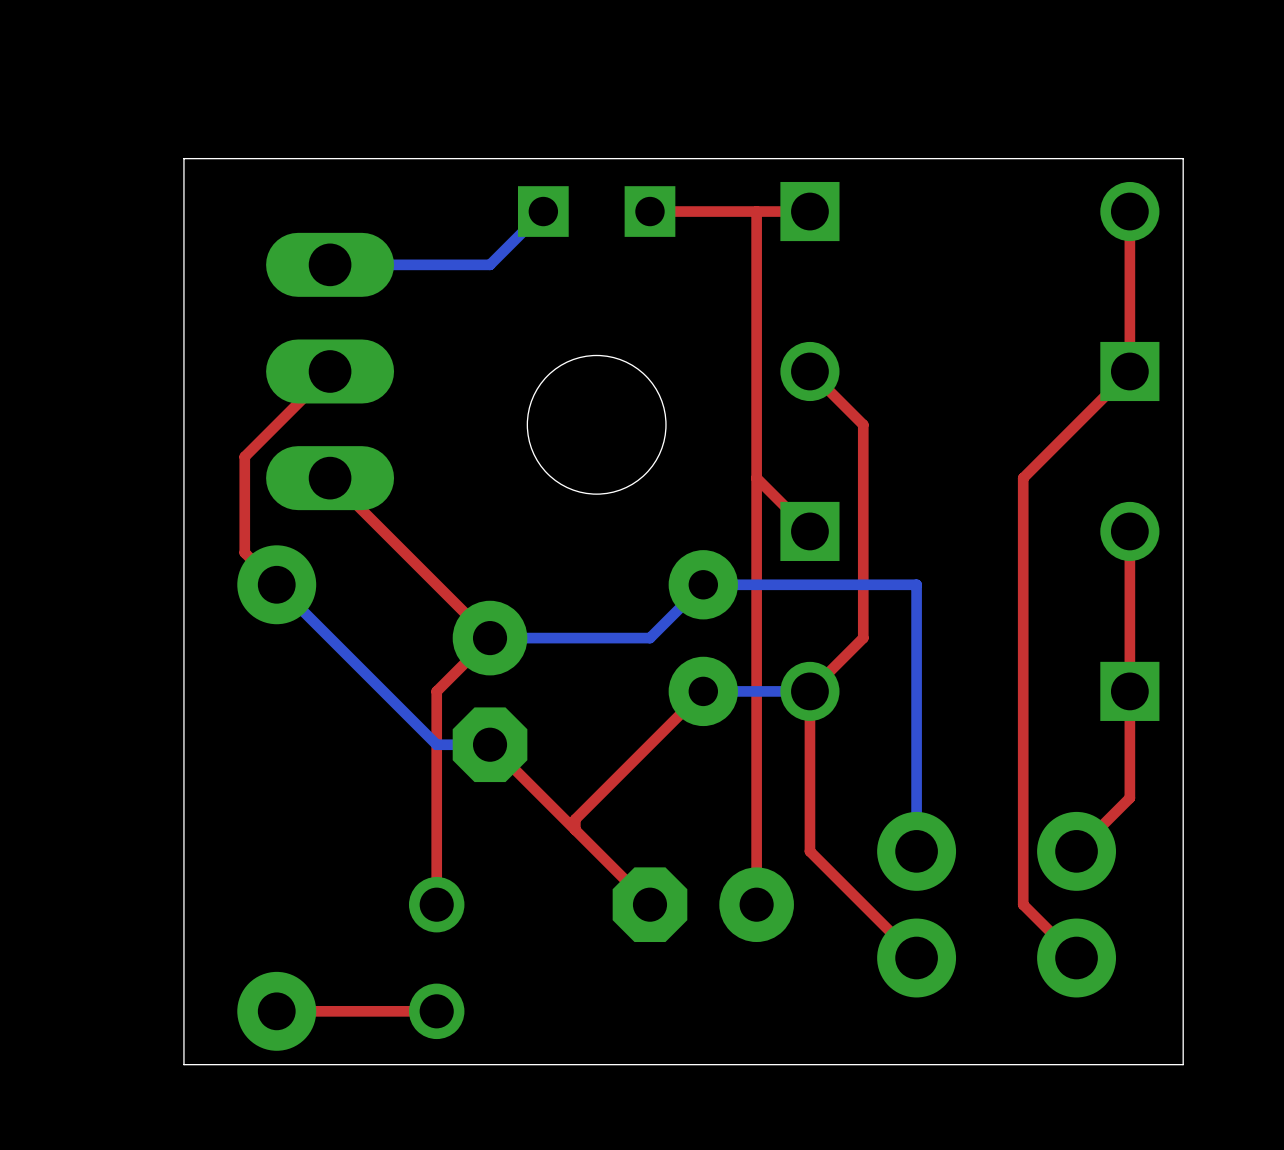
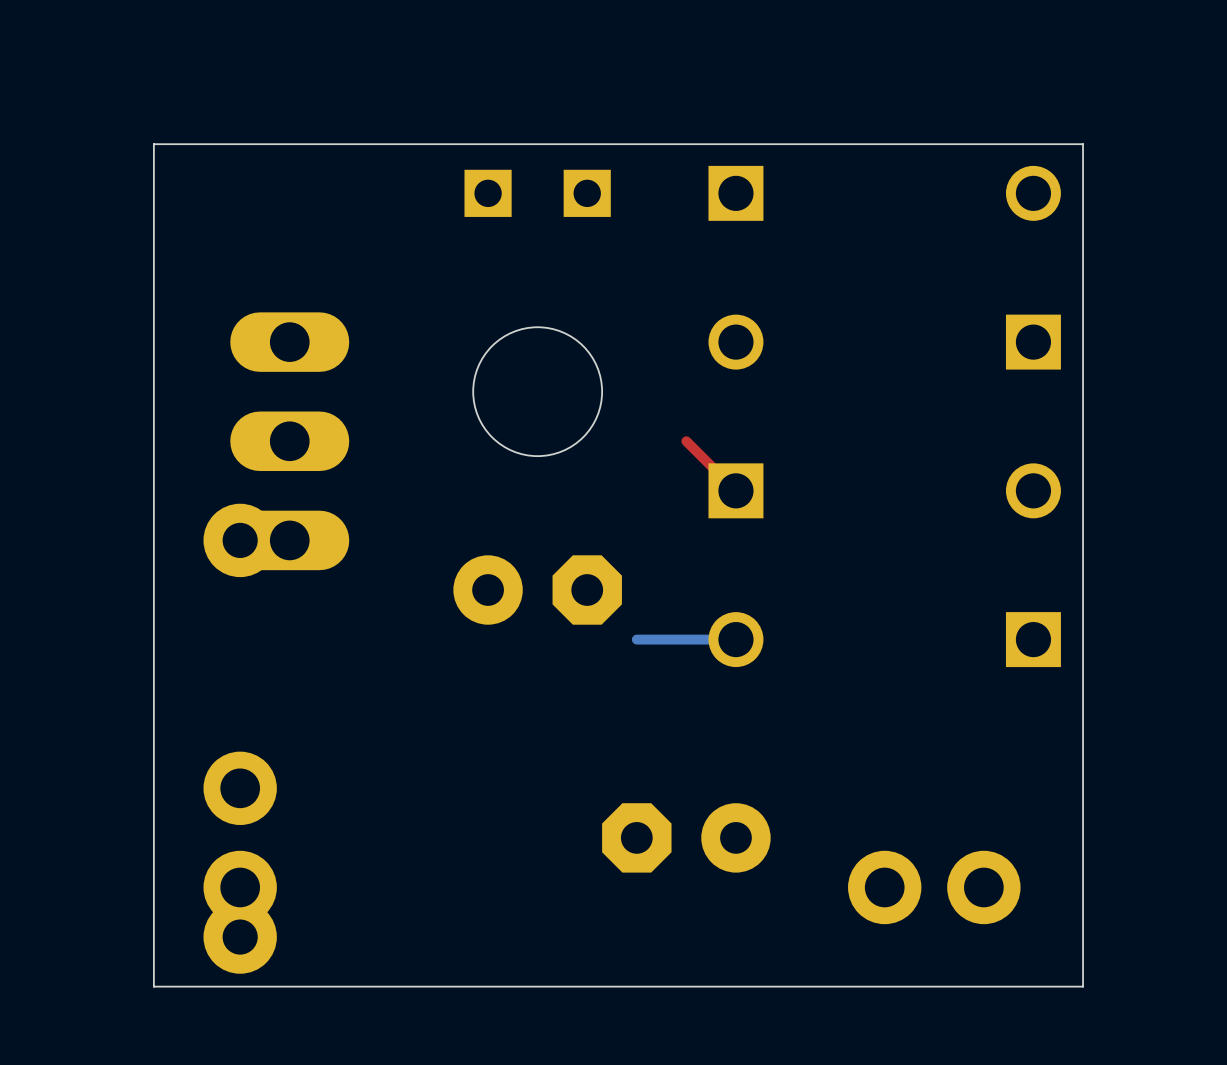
bottom track: (543, 211) (490, 264) (330, 264) -> none
top track: (756, 211) (756, 904) -> none
top track: (809, 211) (649, 211) -> none
top track: (1129, 211) (1129, 371) (1023, 478) (1023, 904) (1076, 958) -> none
top track: (330, 371) (244, 456) (244, 552) (276, 584) -> none
part position: (330, 371) -> (289, 441)
top track: (809, 371) (863, 424) (863, 638) (809, 691) (809, 851) (916, 958) -> none
top track: (330, 478) (490, 638) (436, 691) (436, 904) -> none
top track: (1129, 531) (1129, 798) (1076, 851) -> none
bottom track: (276, 584) (436, 744) (490, 744) -> none
bottom track: (490, 638) (649, 638) (703, 584) (916, 584) (916, 851) -> none
part: (703, 638) -> none
part rotation: 0° (490, 691) -> 90° counterclockwise (537, 590)
part position: (490, 691) -> (537, 590)
top track: (703, 691) (575, 819) (575, 830) -> none
top track: (490, 744) (649, 904) -> none
part: none -> (240, 837)
part position: (703, 904) -> (686, 837)
part: (916, 904) -> none
part: (1076, 904) -> none
part: (436, 958) -> none
part: none -> (934, 887)
top track: (436, 1011) (276, 1011) -> none

